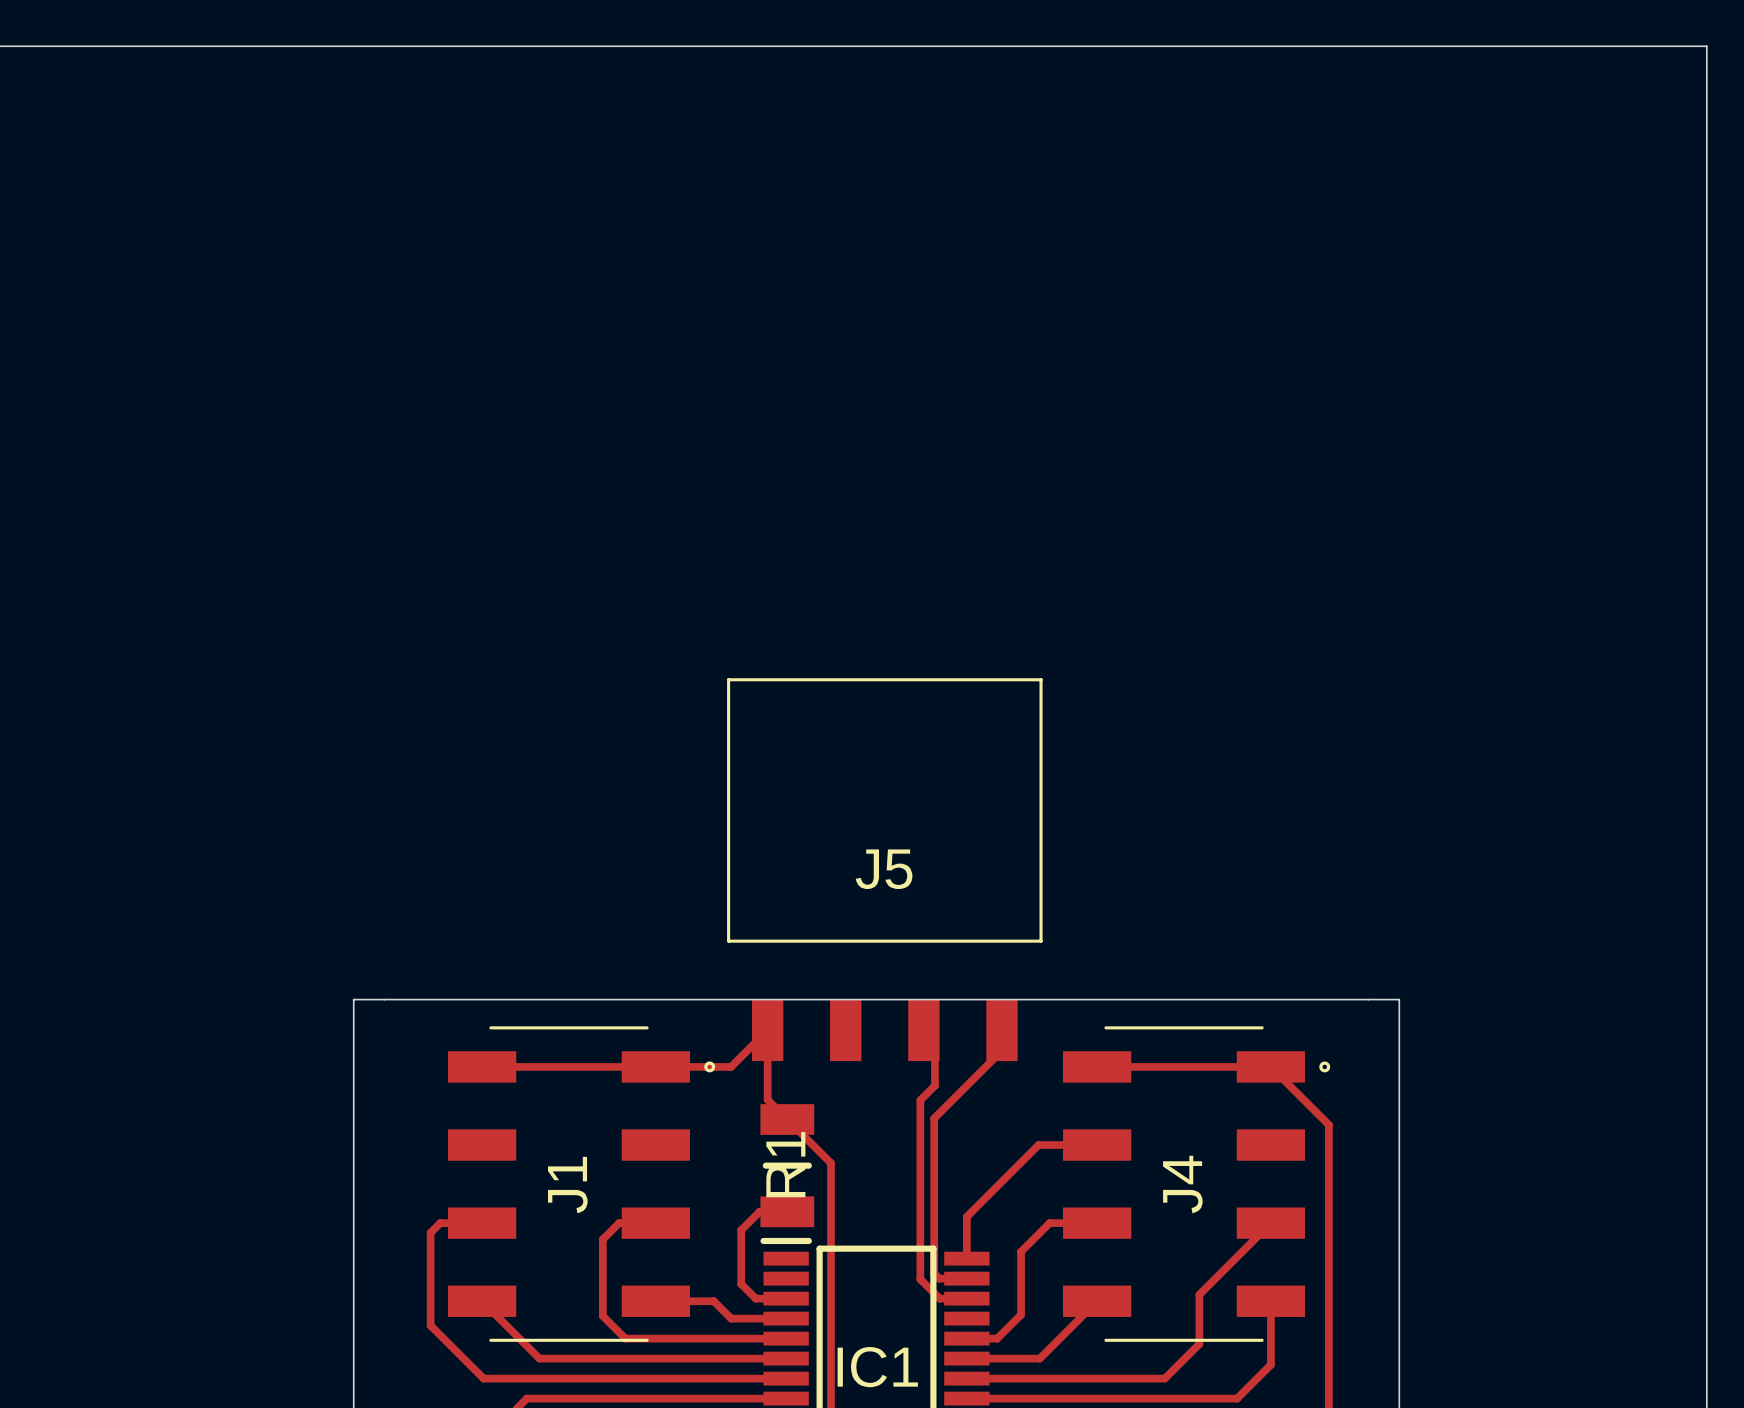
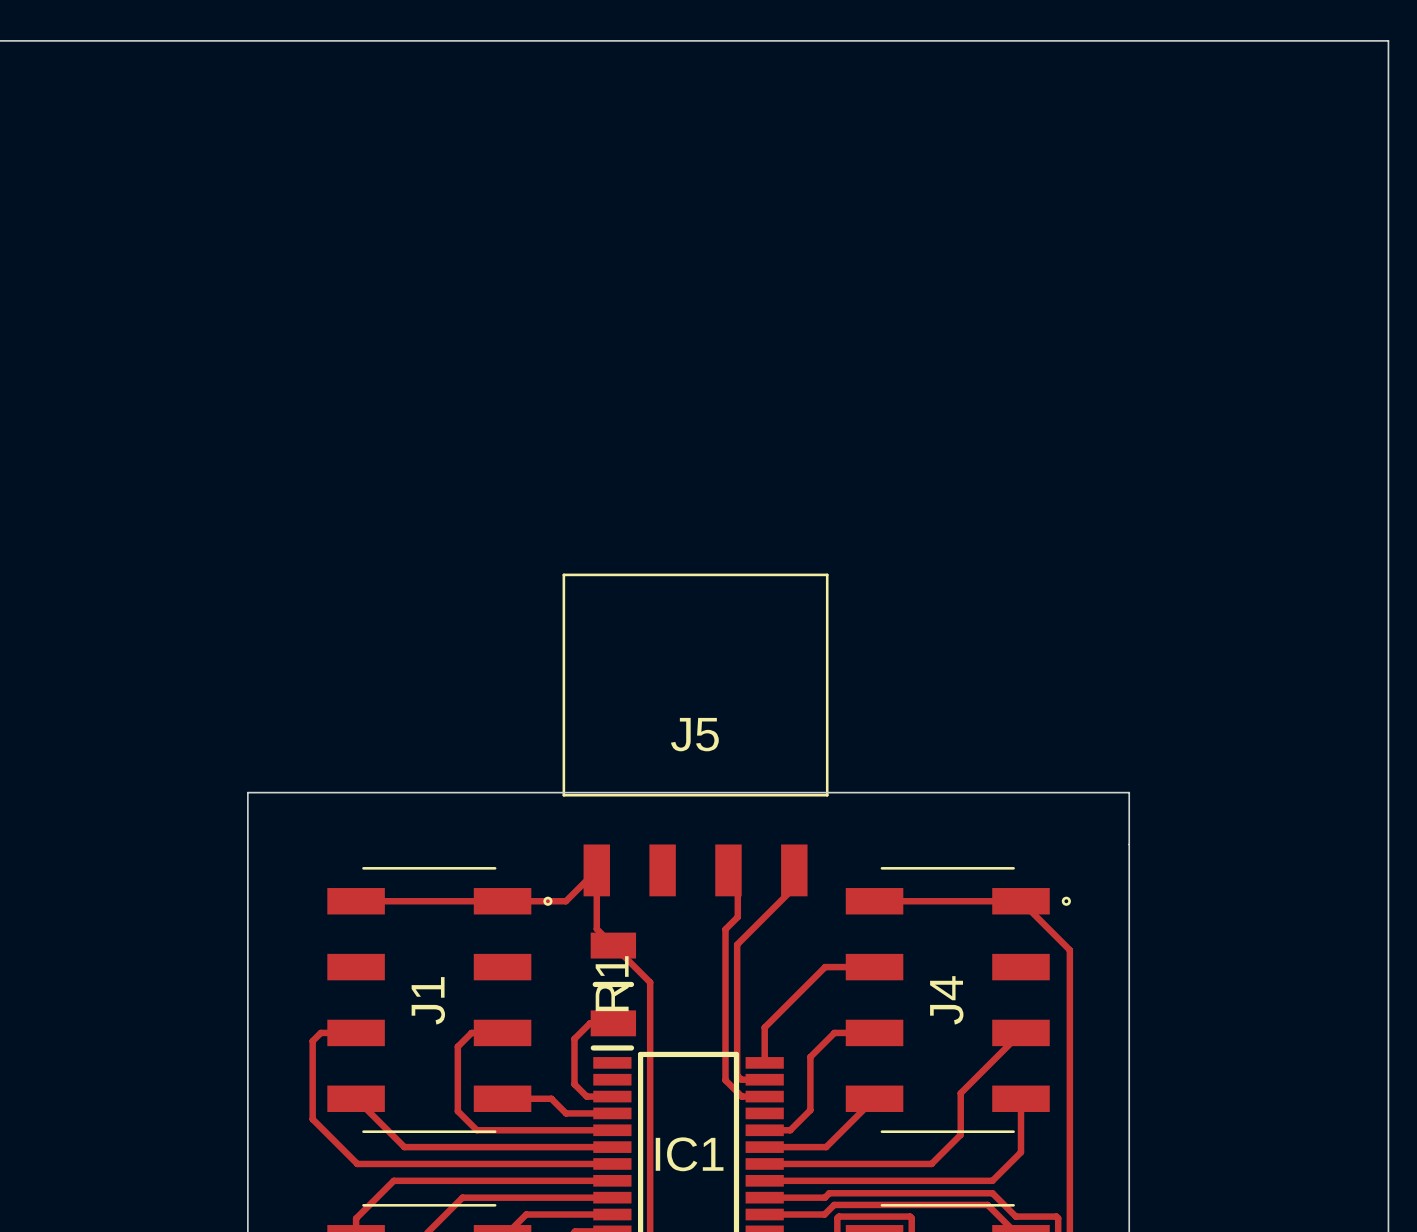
board edge: (353, 999) (1399, 999) -> (247, 844) (247, 792) (1129, 792) (1129, 844)

